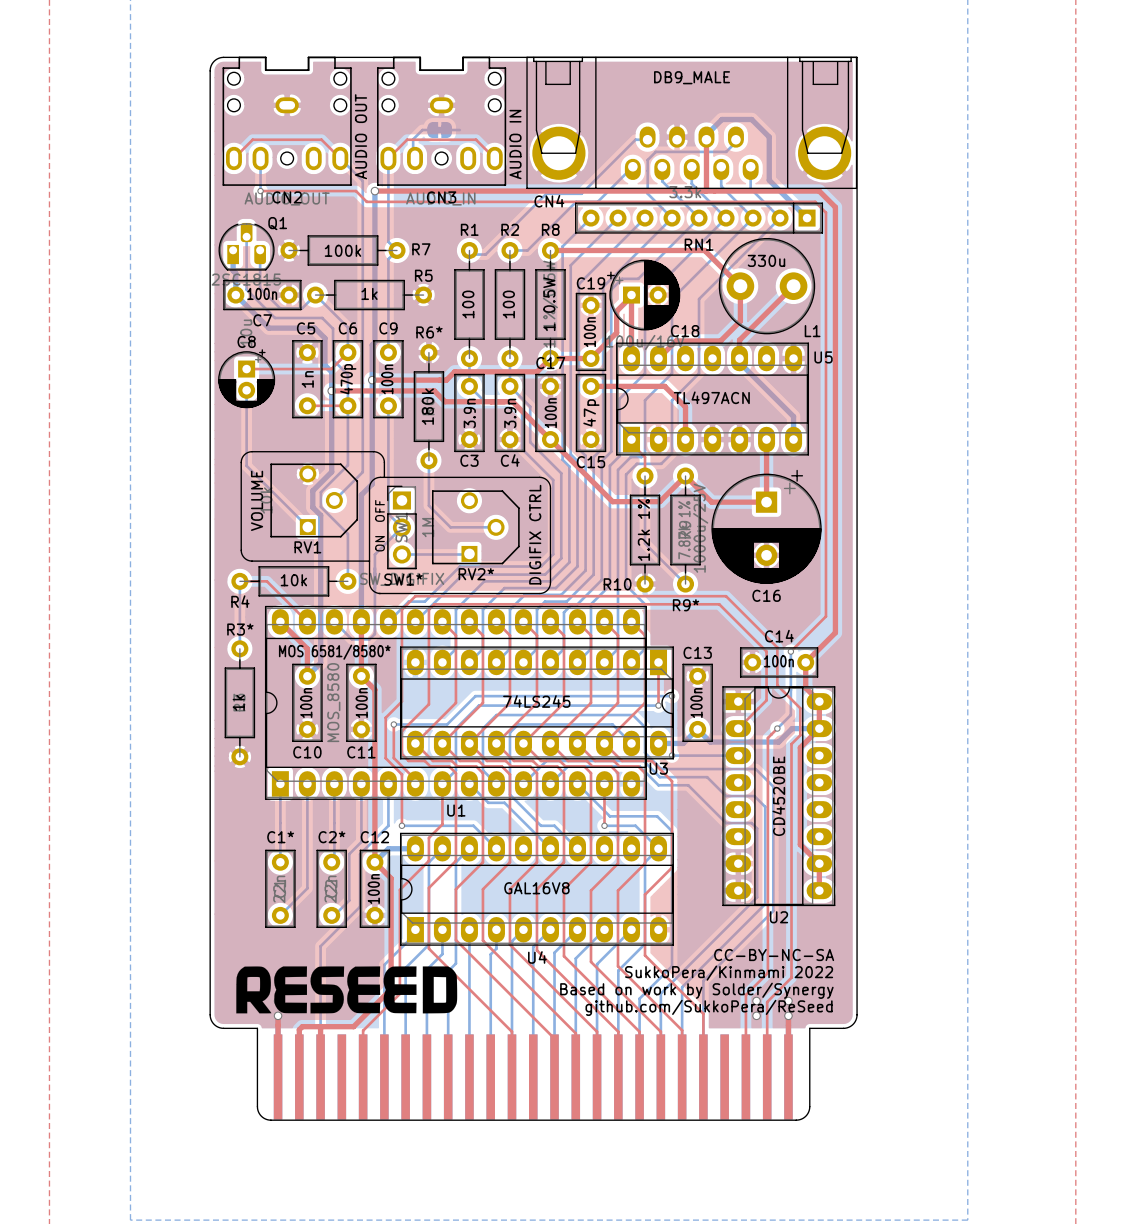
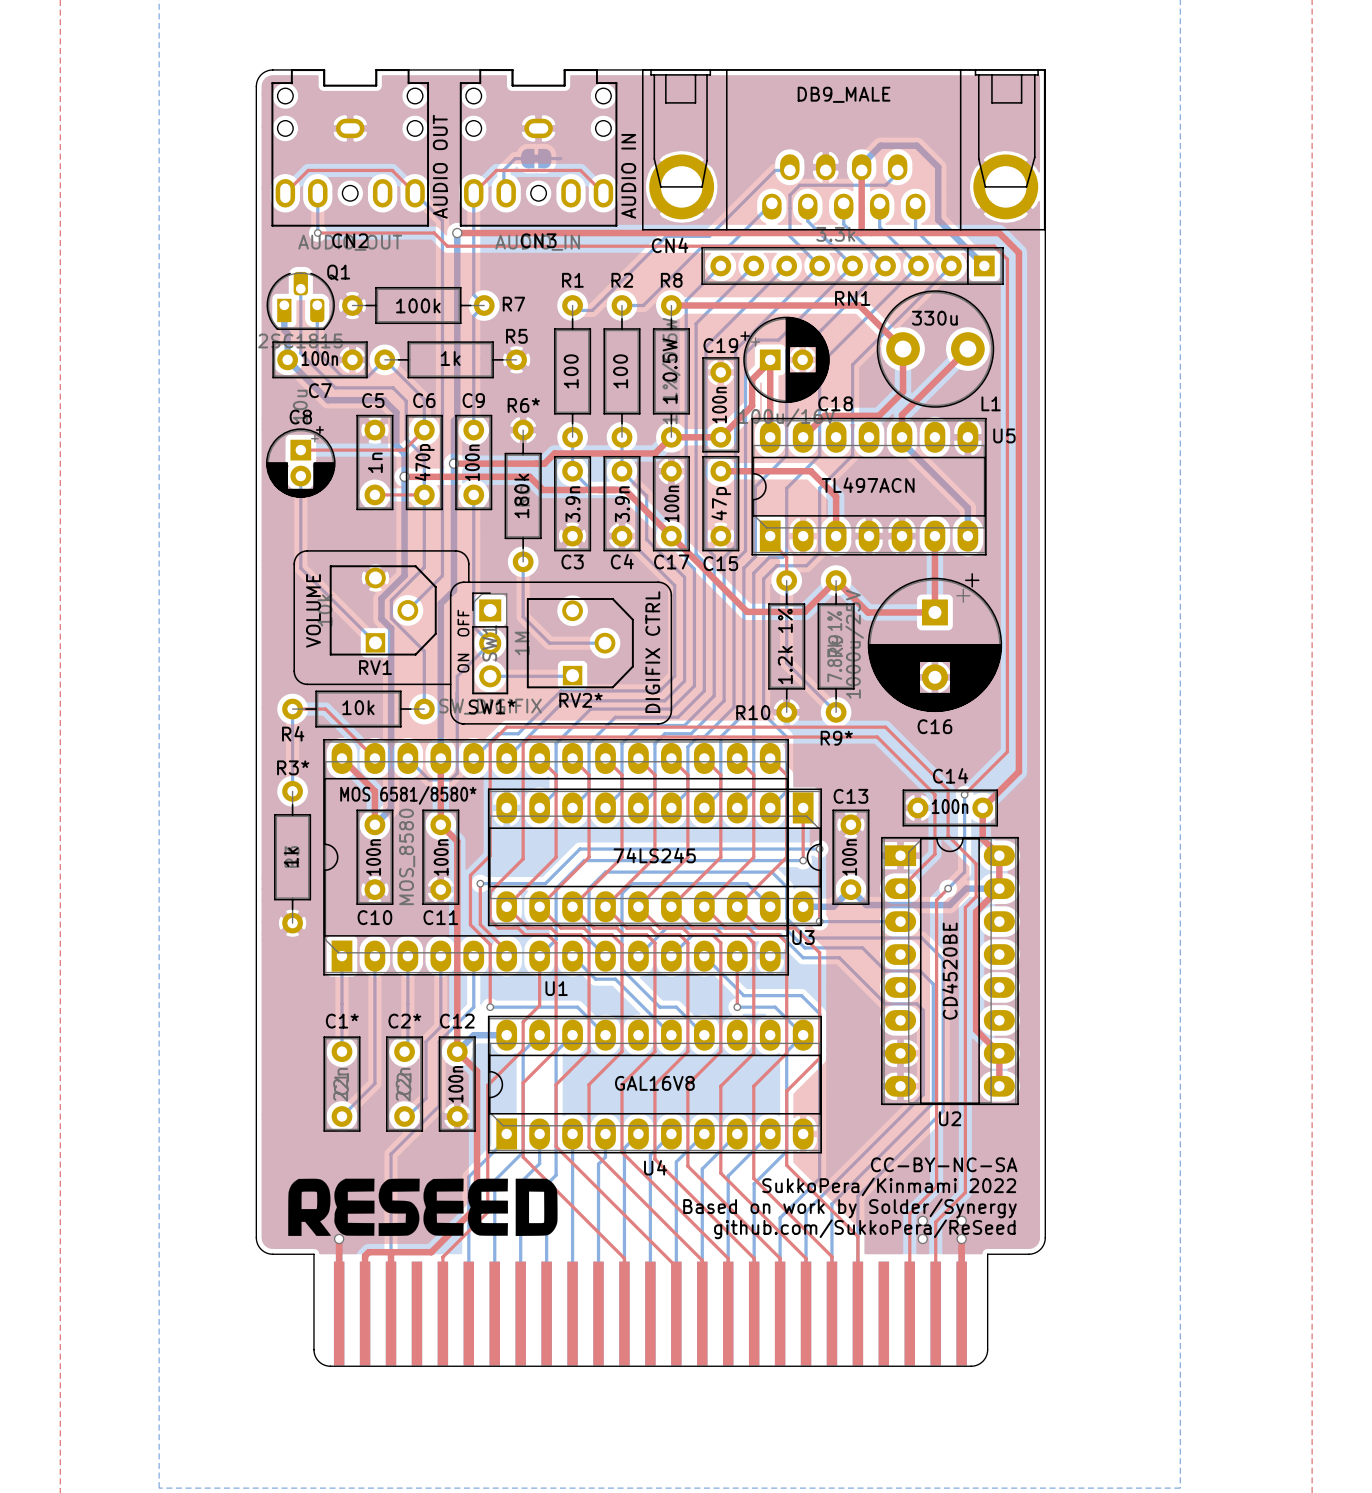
C17 name position: C17 (550, 363) -> C17 (671, 561)

